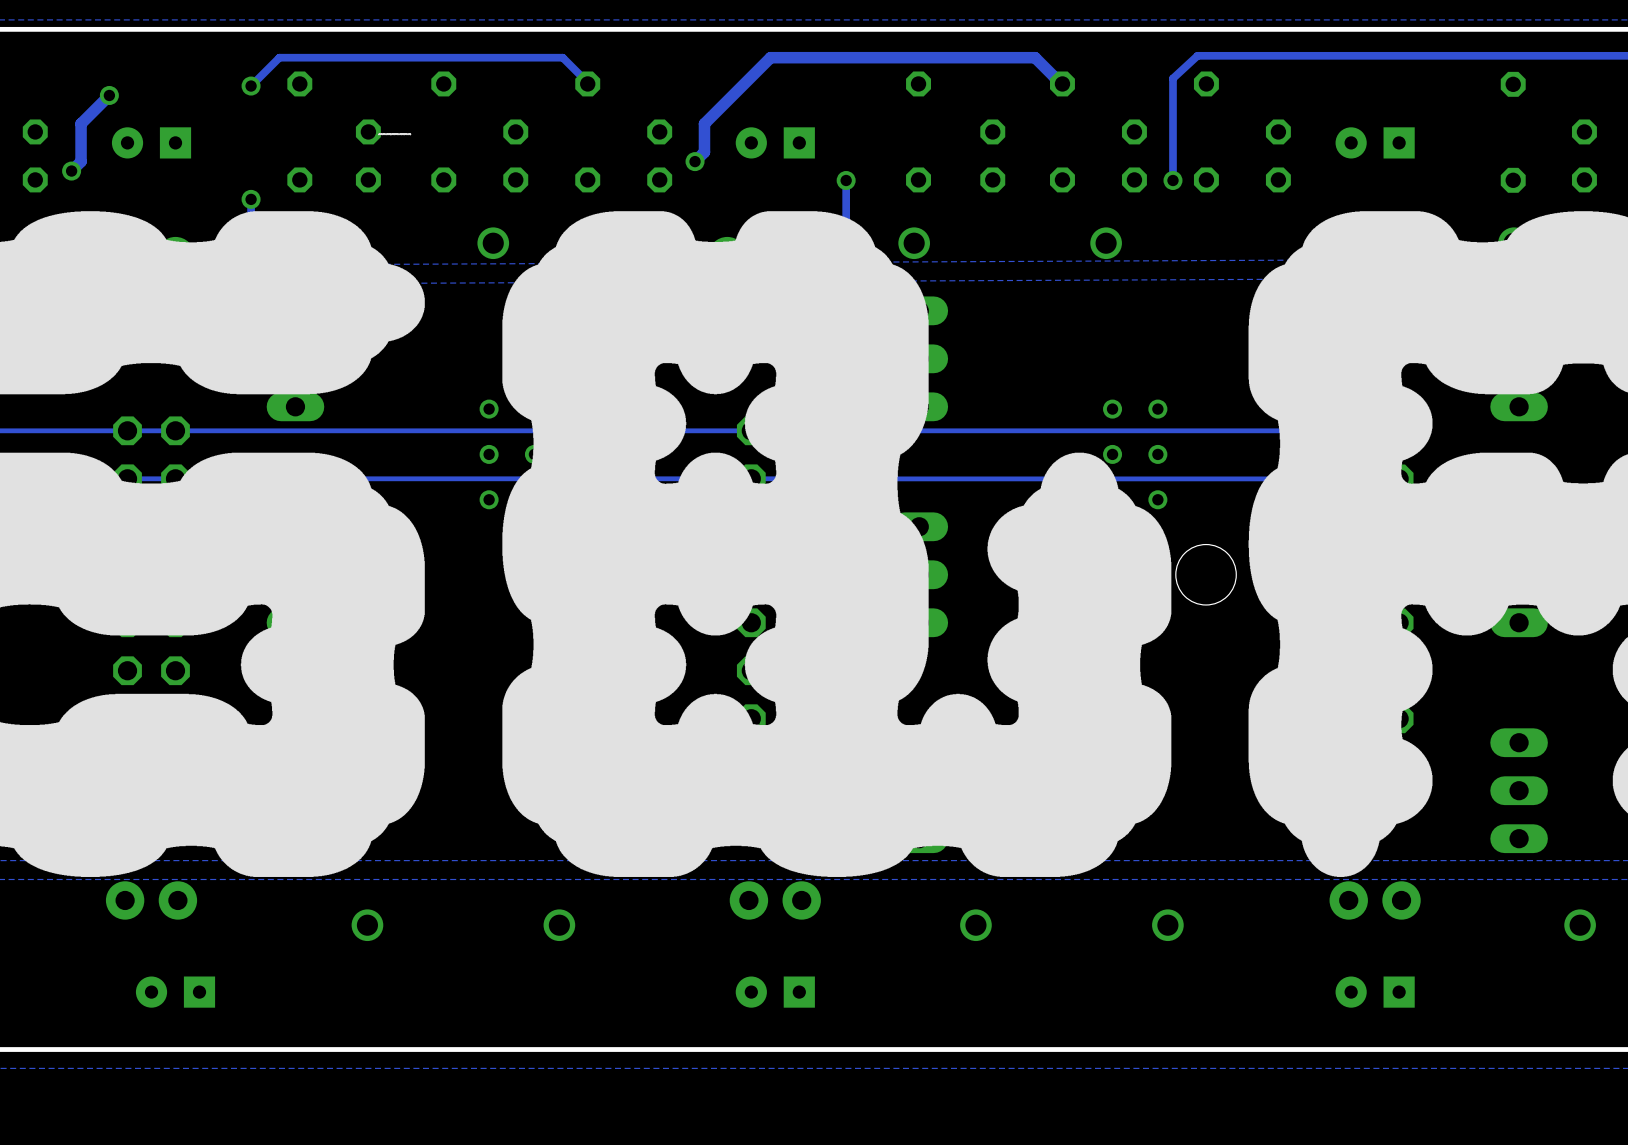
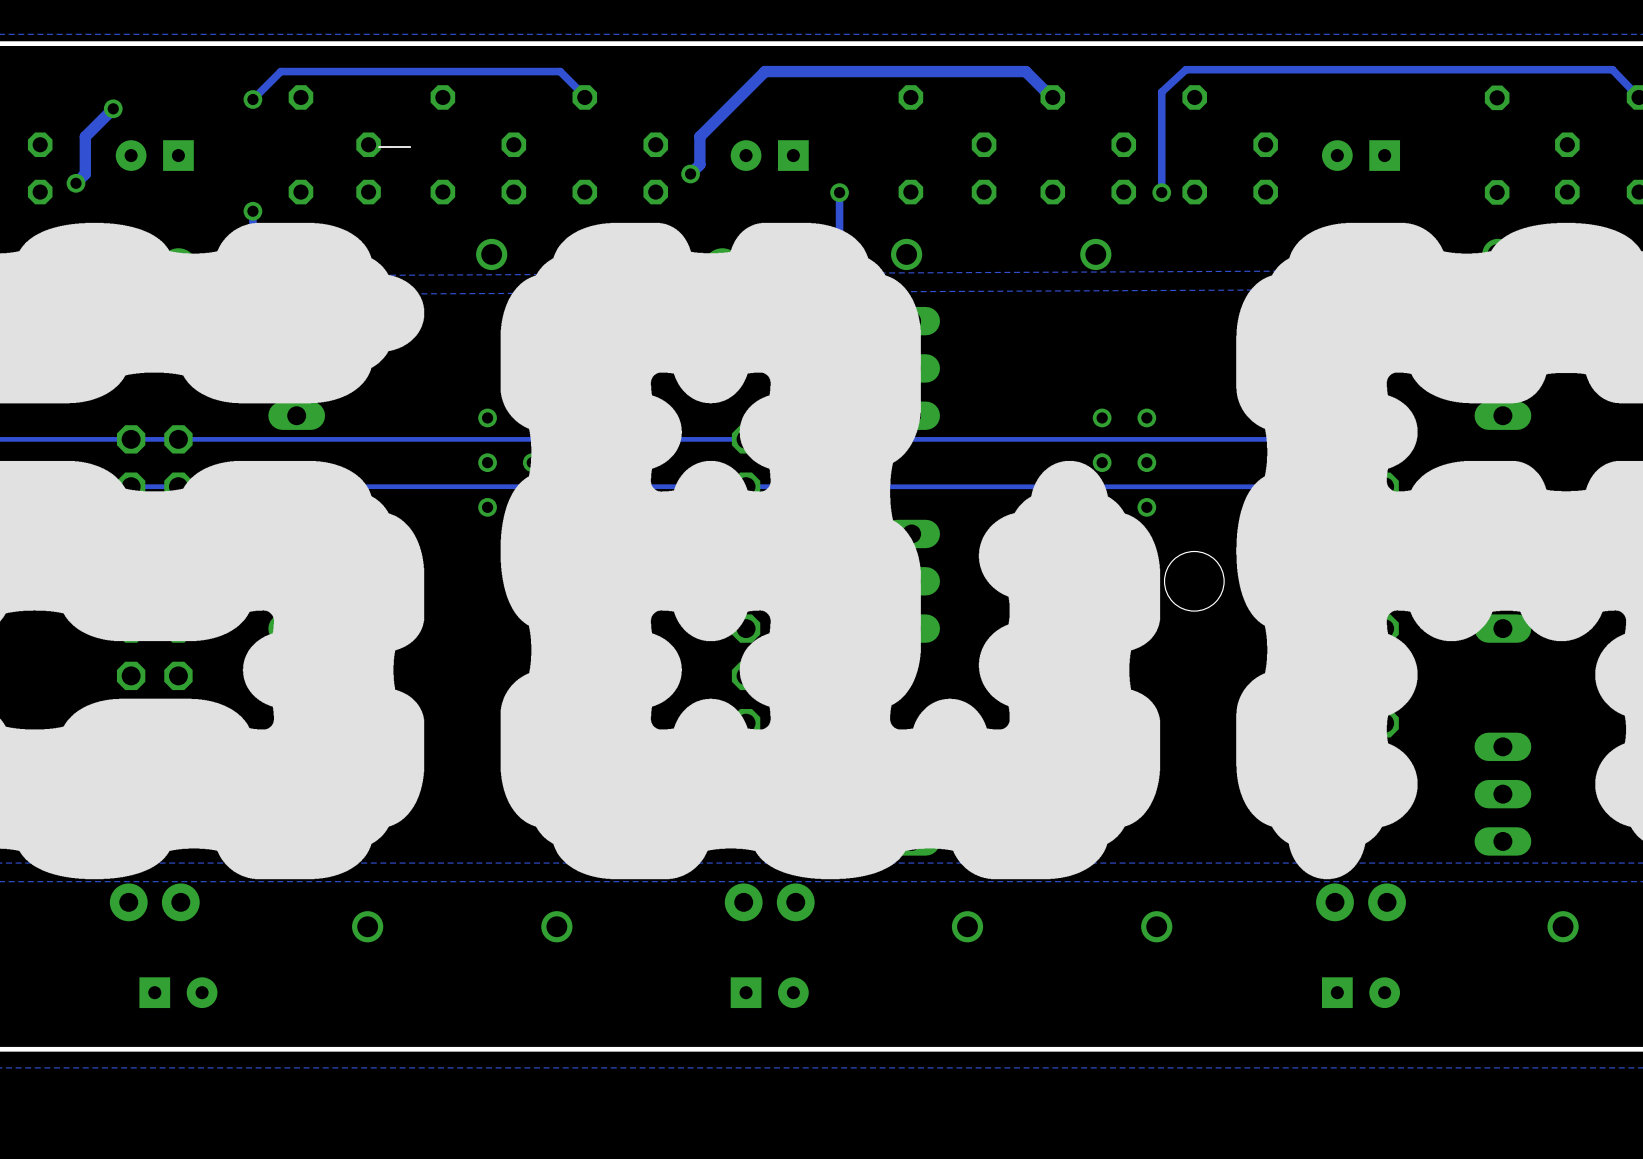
part rotation: 0° (175, 992) -> 180° (178, 992)
part rotation: 0° (775, 992) -> 180° (769, 992)
part rotation: 0° (1375, 992) -> 180° (1361, 992)

